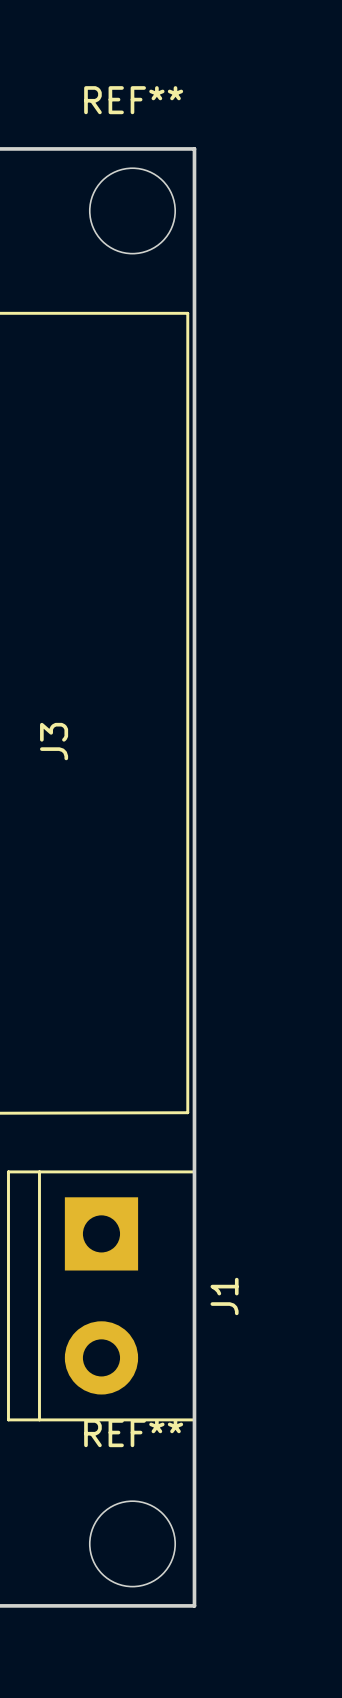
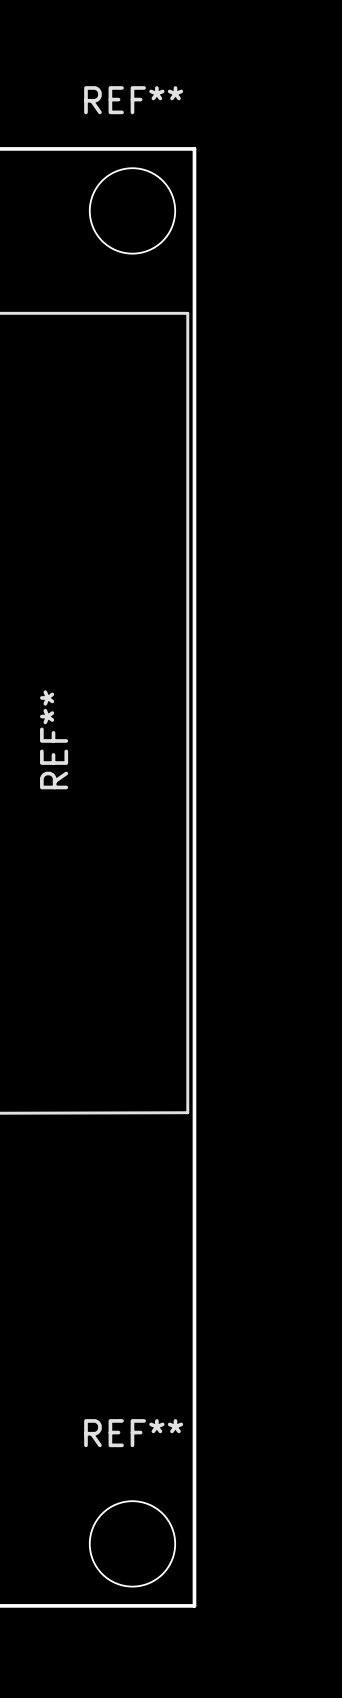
J3 name: J3 (54, 741) -> REF** (54, 739)
J1: (101, 1295) -> none

